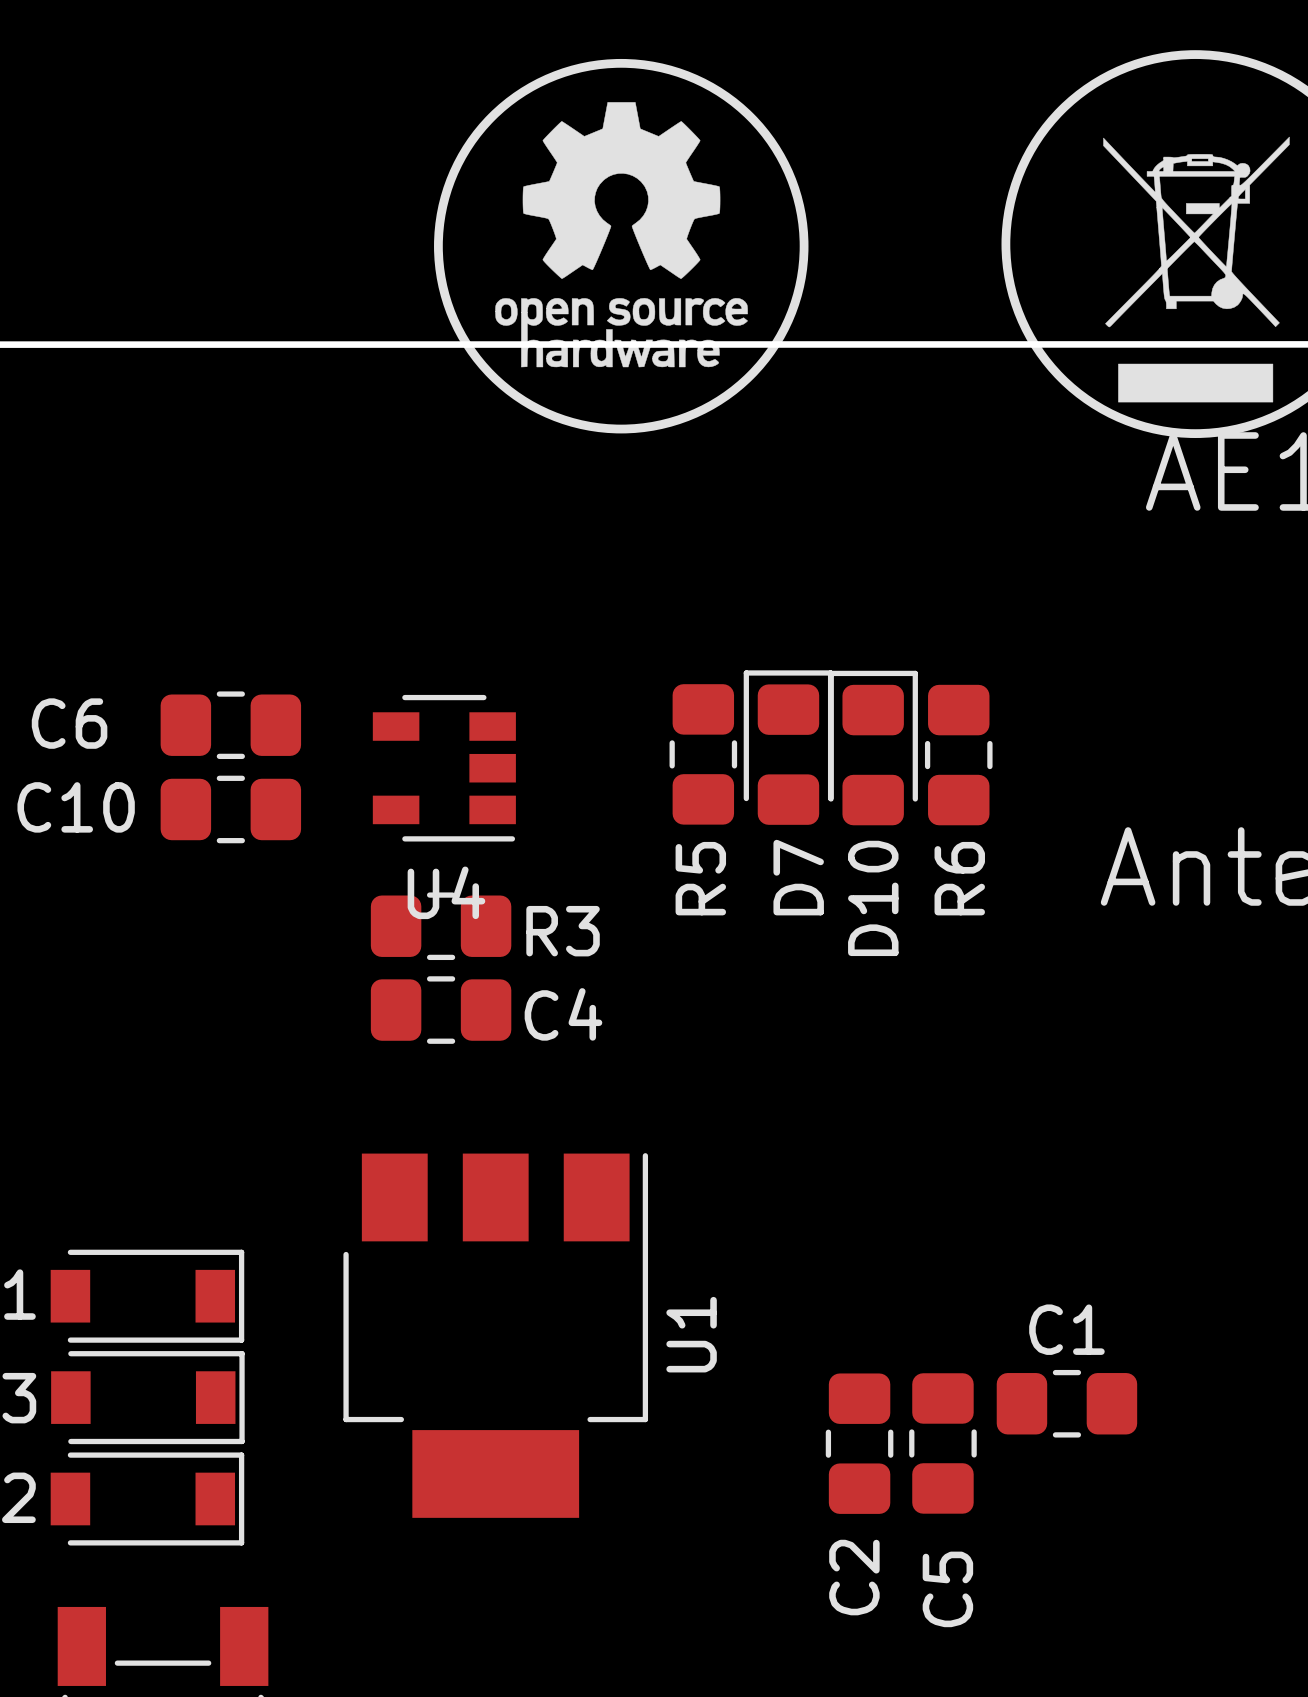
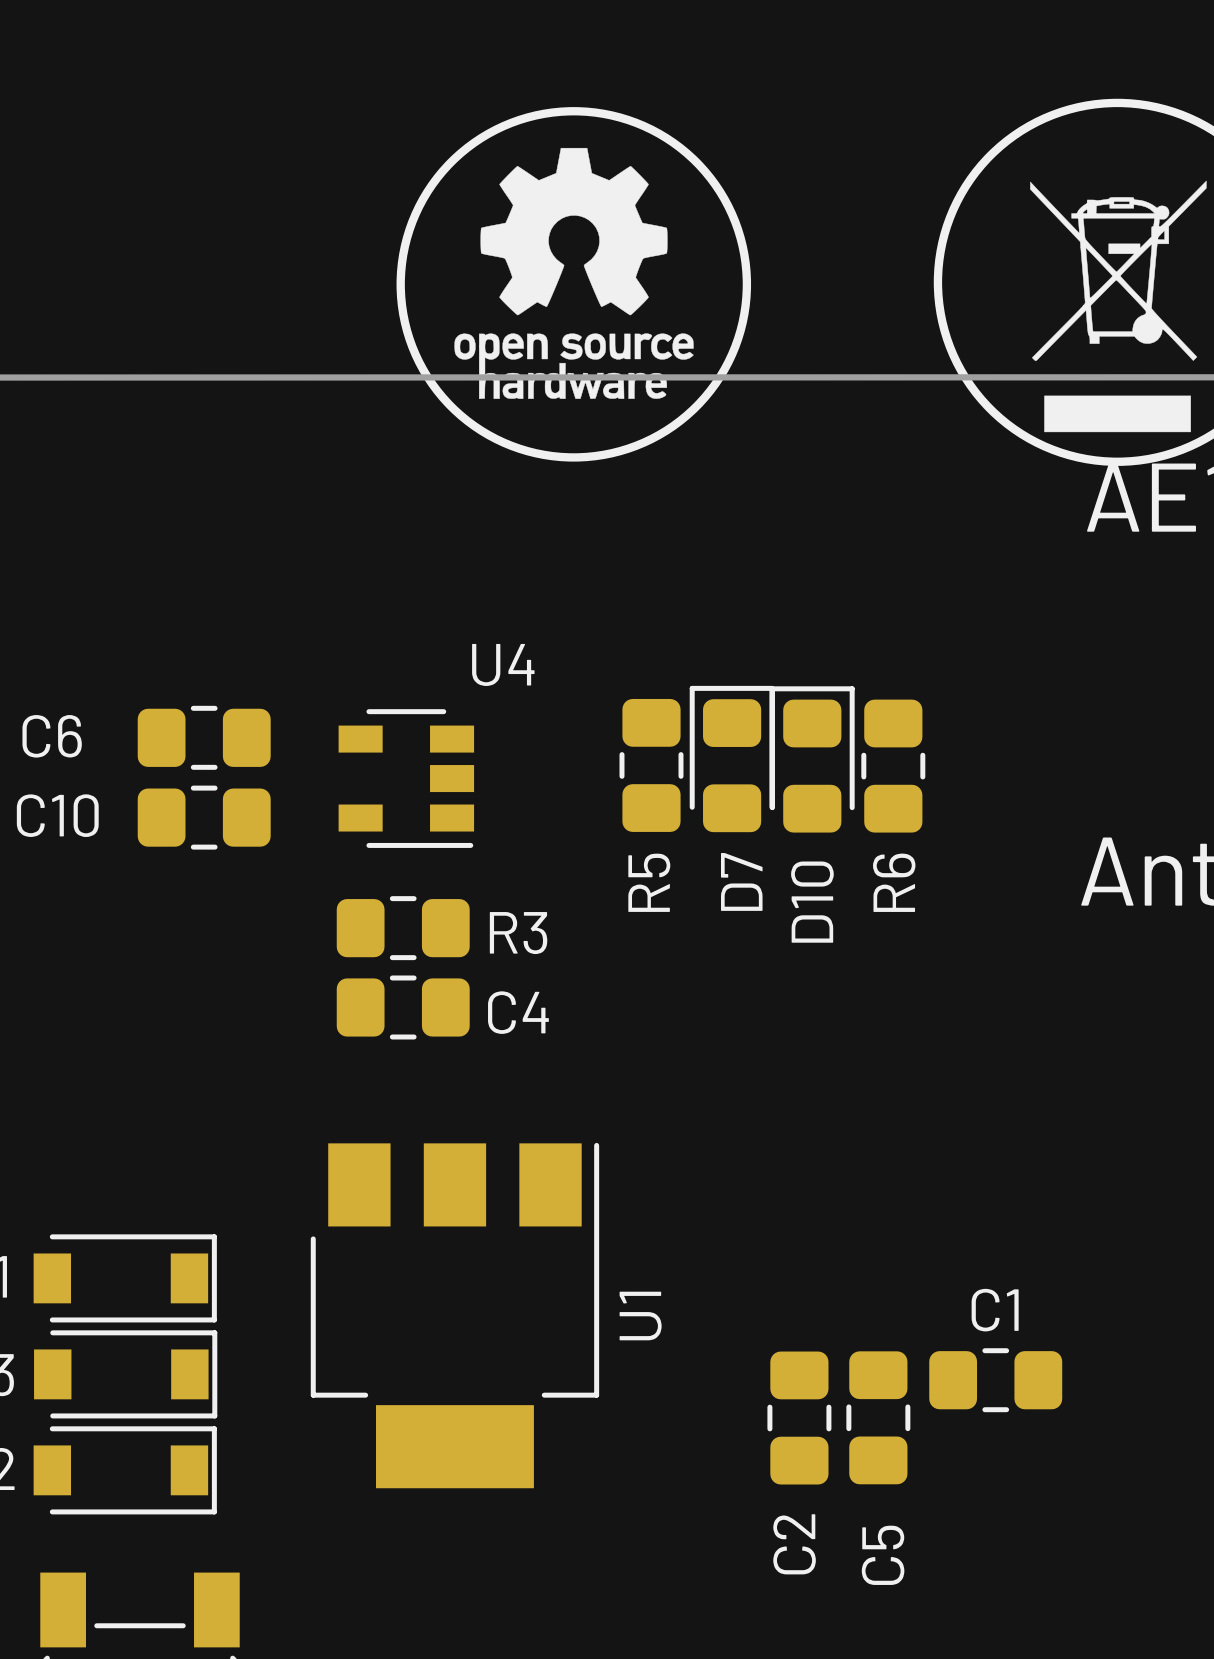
U4 name position: U4 (446, 892) -> U4 (503, 664)

